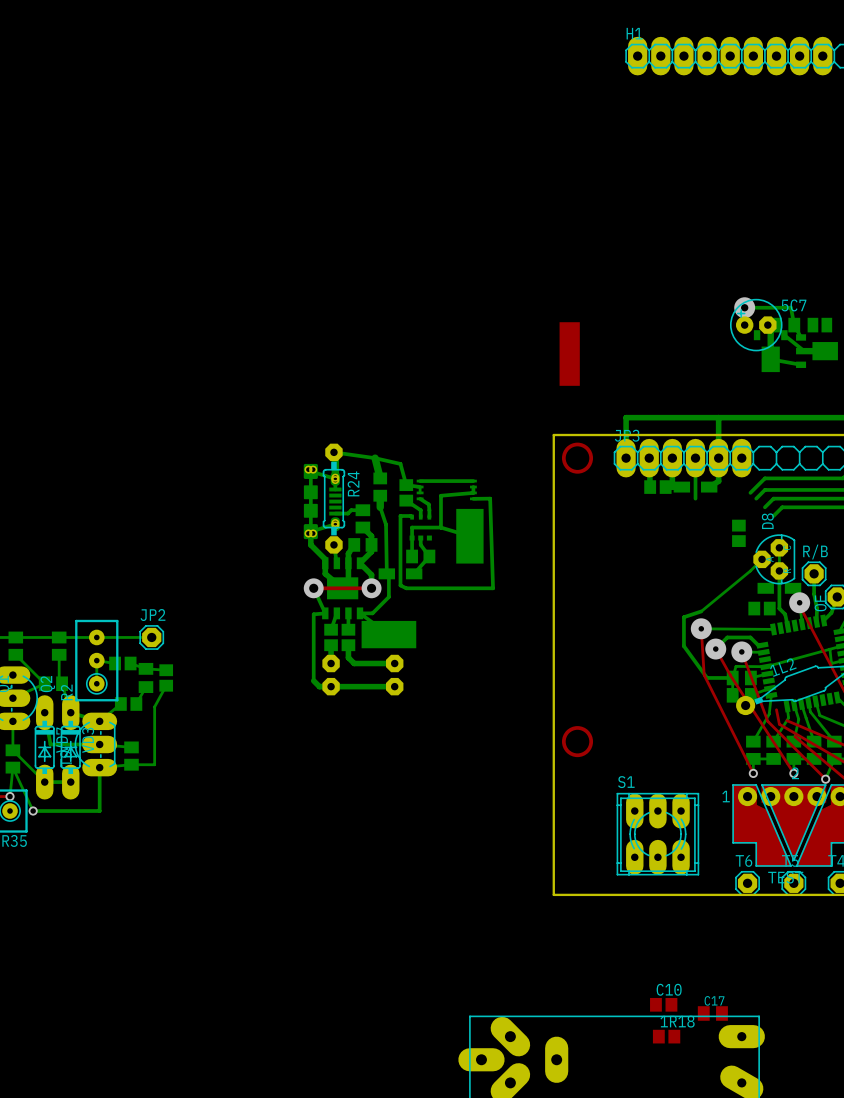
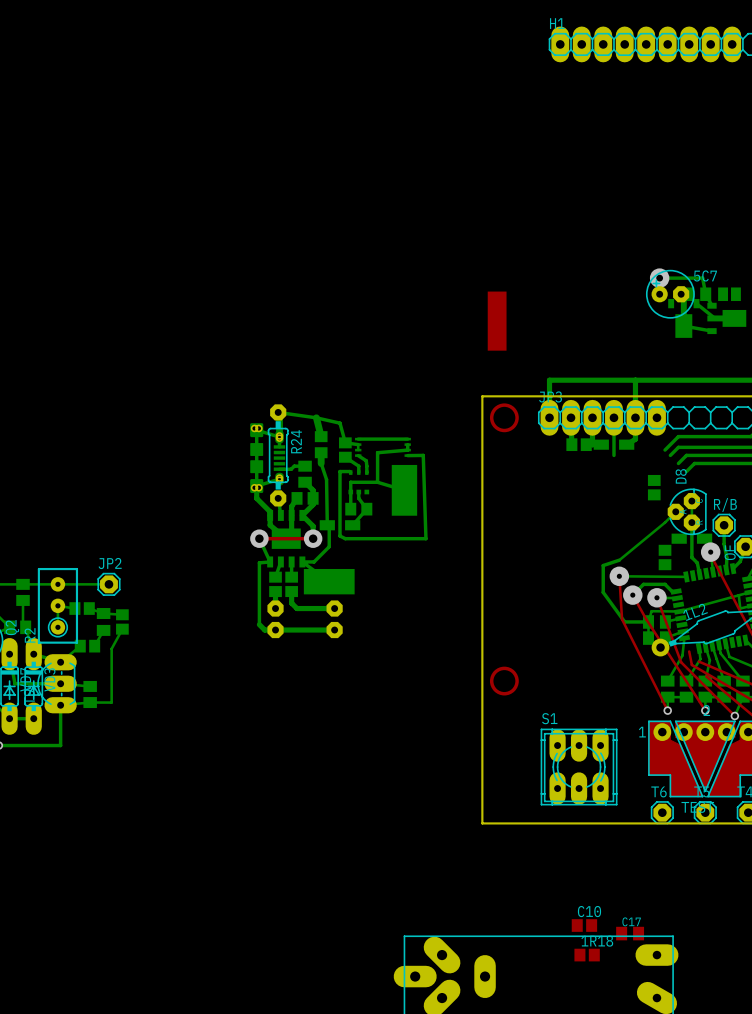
part rotation: 0° (762, 608) -> 90° clockwise (665, 557)

